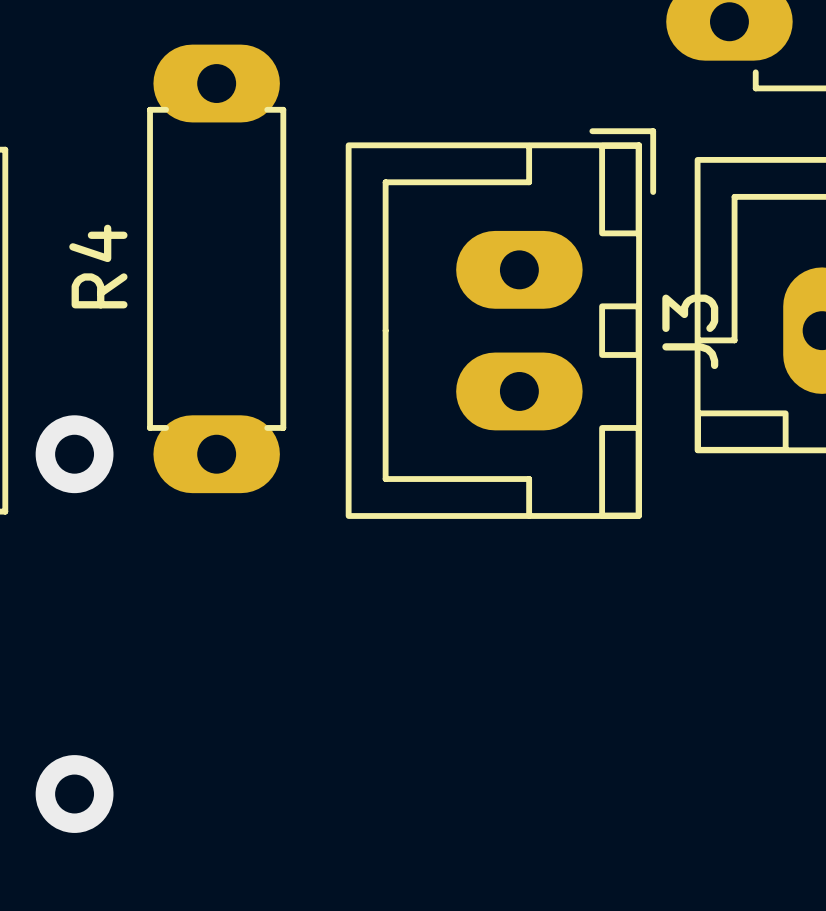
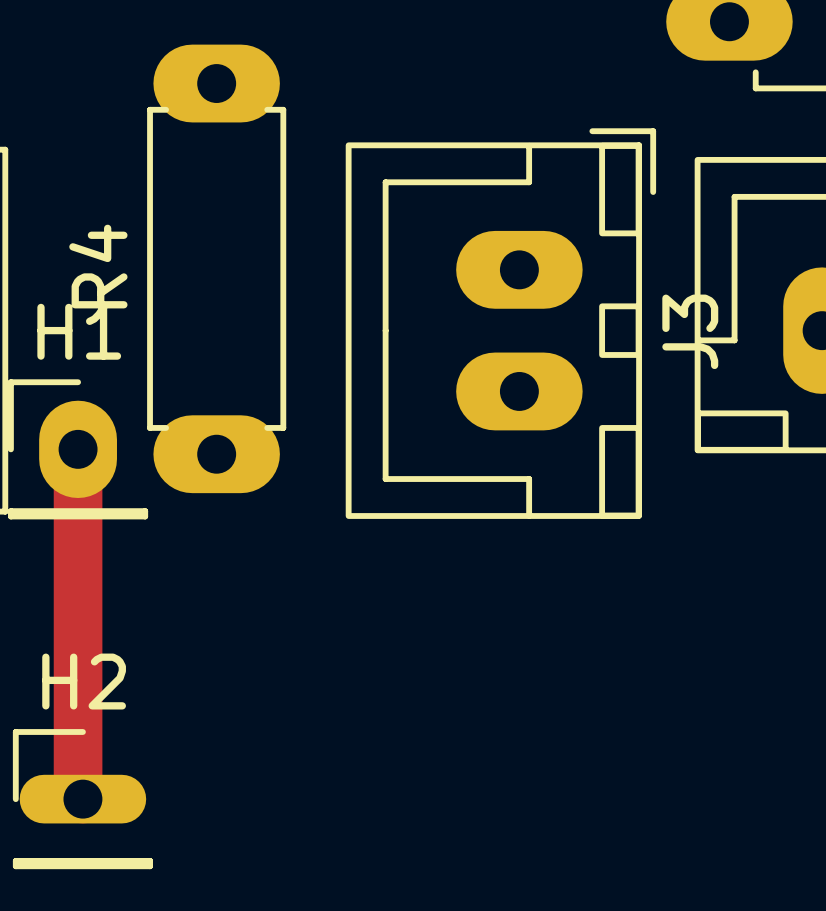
track: none -> (78, 449) (78, 794) (82, 799)
H1: none -> (78, 449)
via: (74, 454) -> none
via: (74, 794) -> none
H2: none -> (82, 799)

